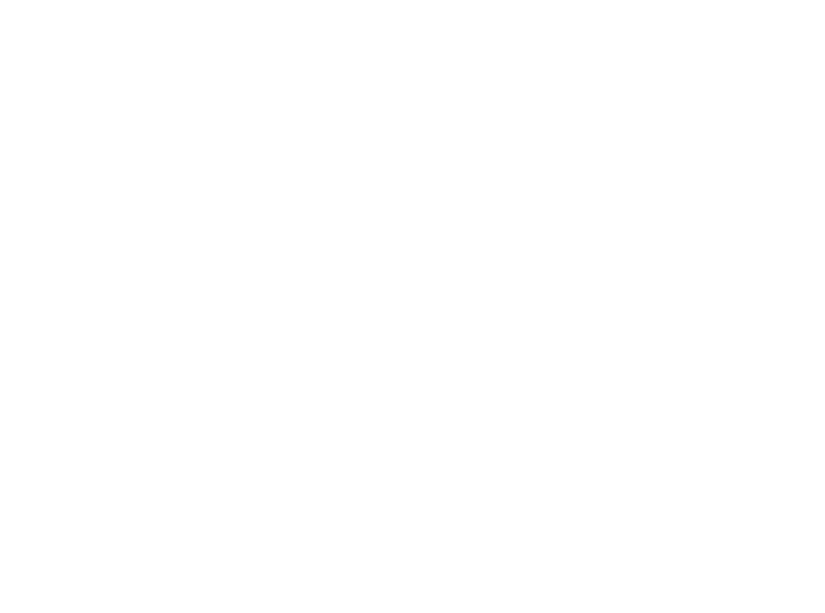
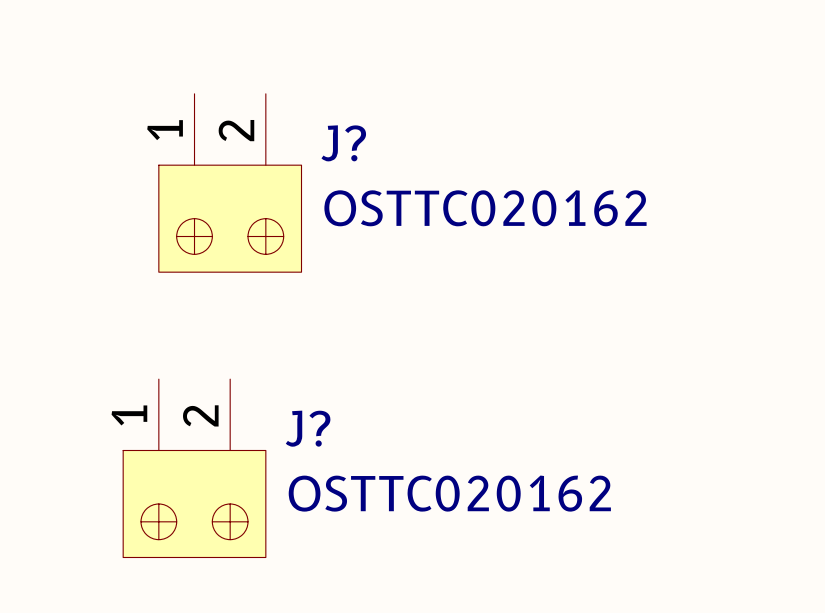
J?: none -> OSTTC020162 (230, 183)
J?: none -> OSTTC020162 (194, 468)

